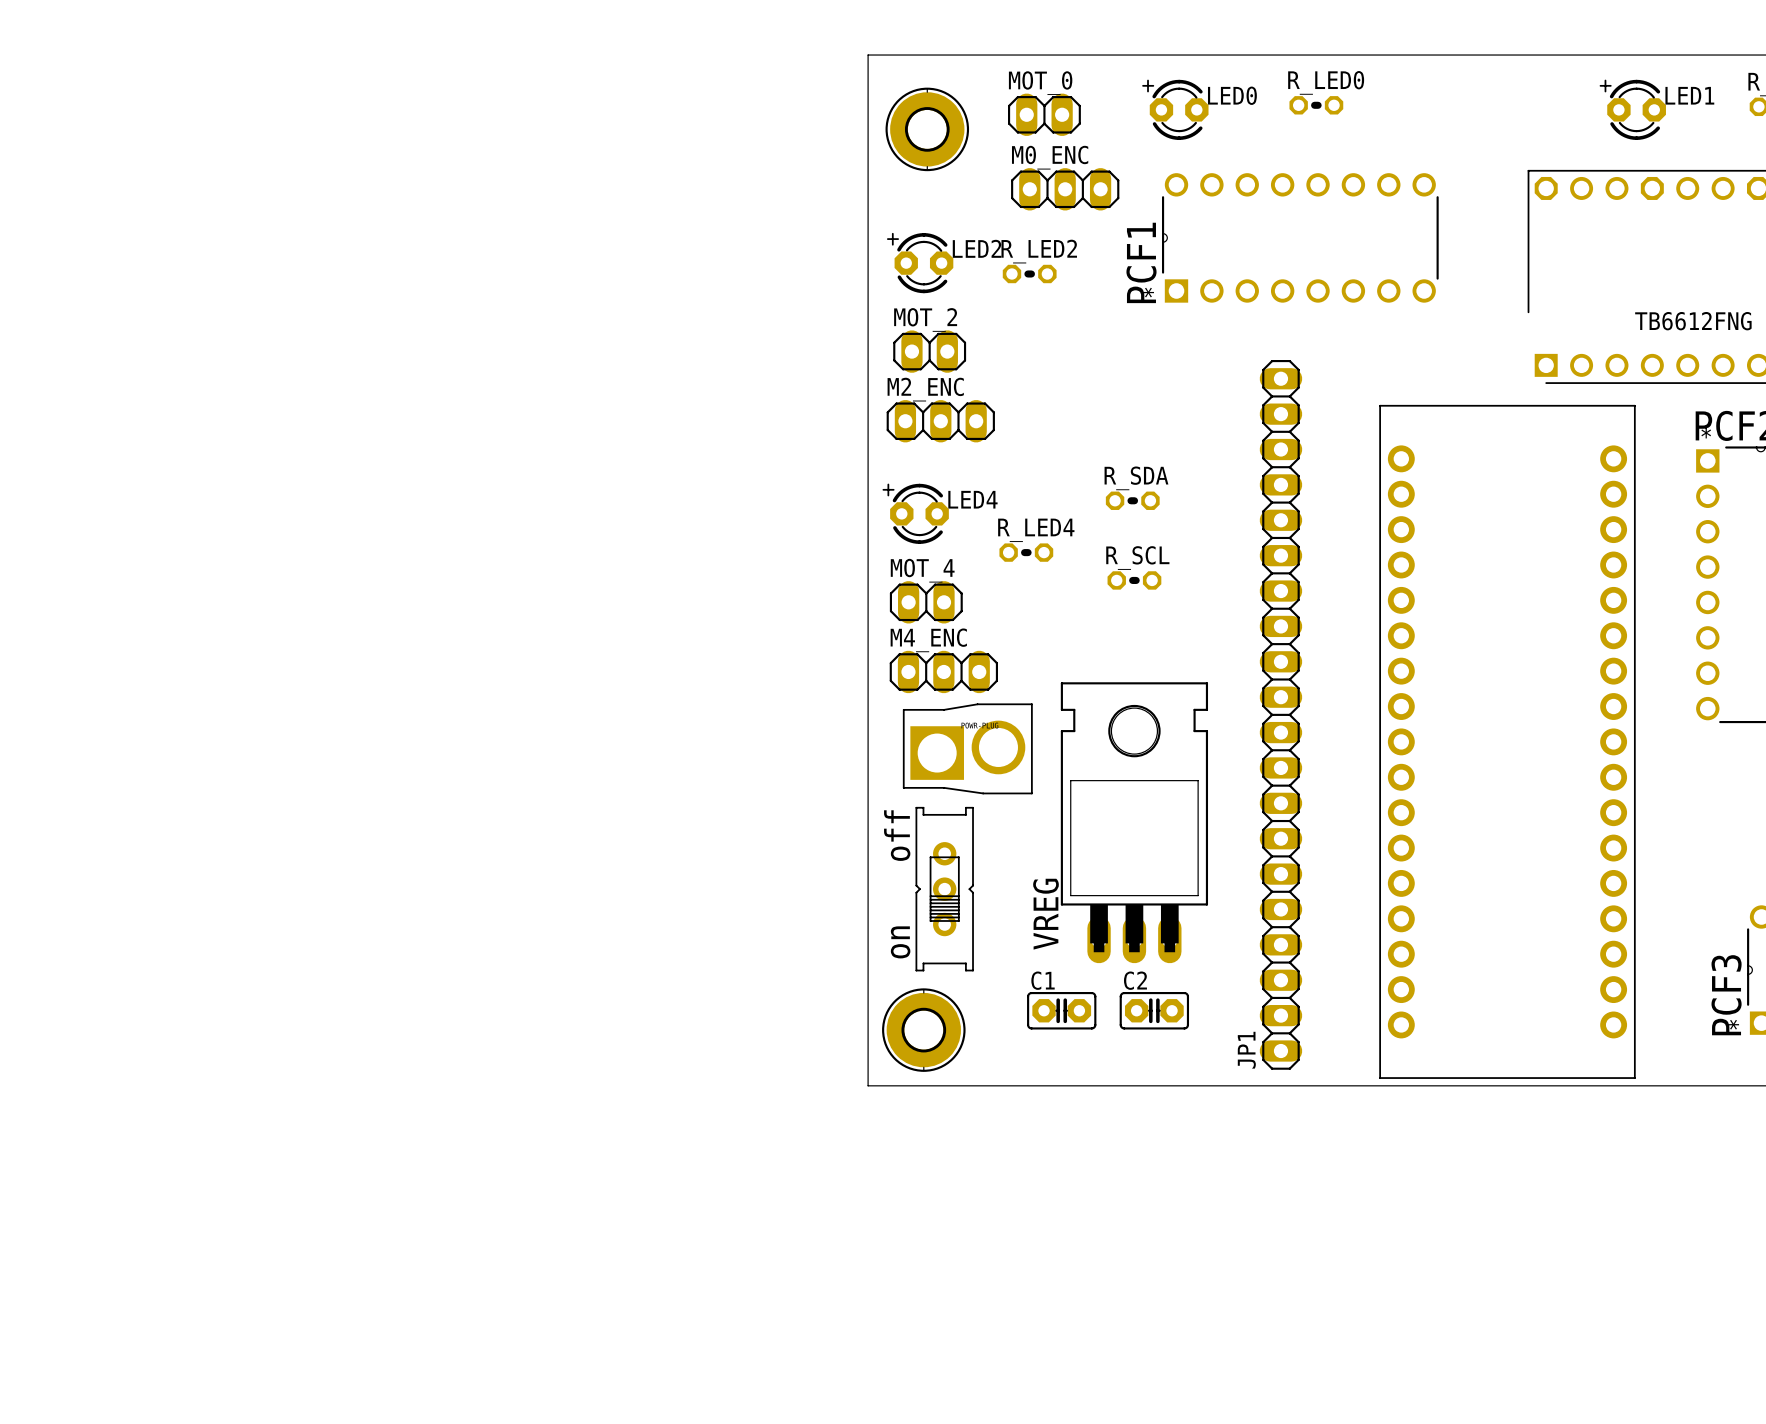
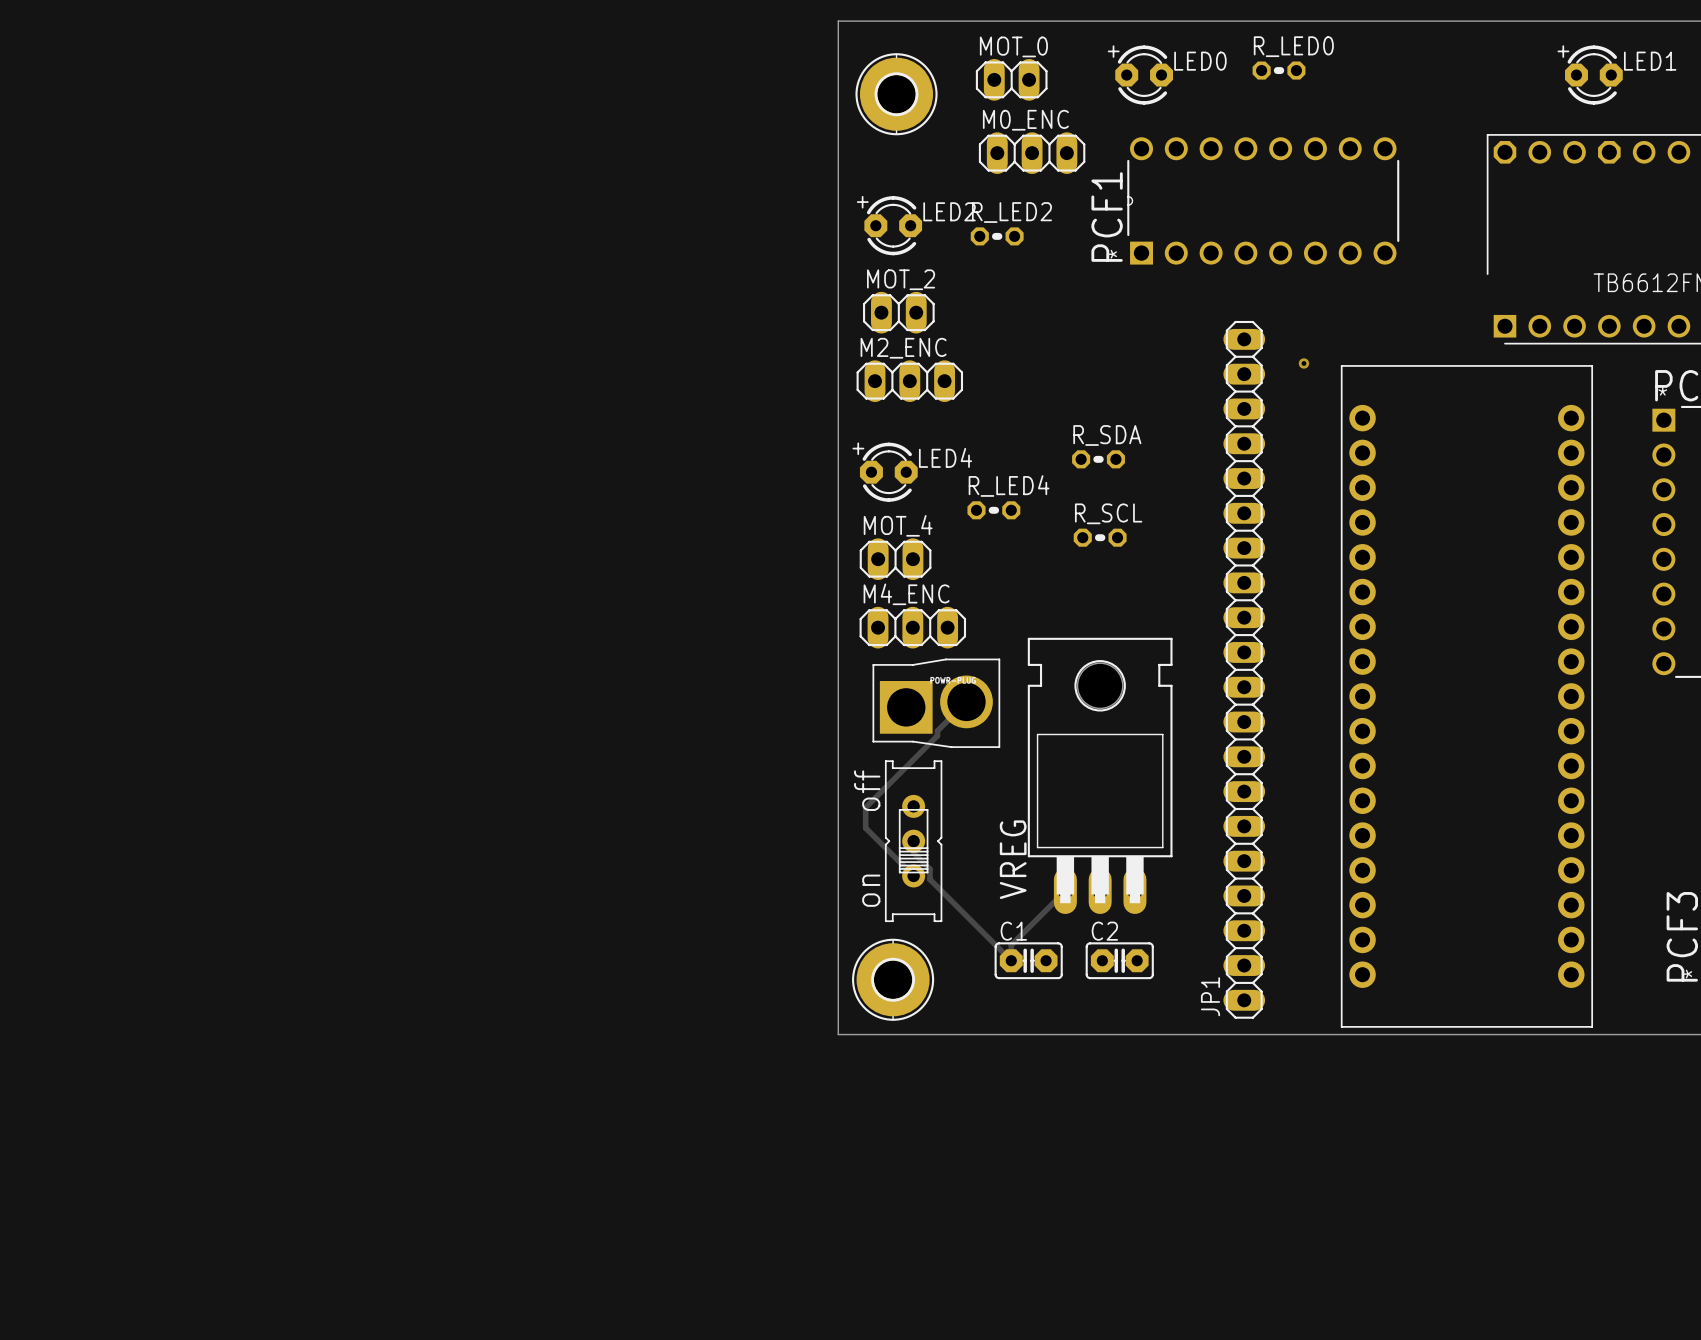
via: none -> (1303, 363)
track: none -> (966, 701) (937, 730) (937, 735) (865, 807) (865, 828) (913, 875)
track: none -> (913, 841) (913, 852) (929, 869) (929, 879) (1011, 960) (1011, 945) (1065, 891)

